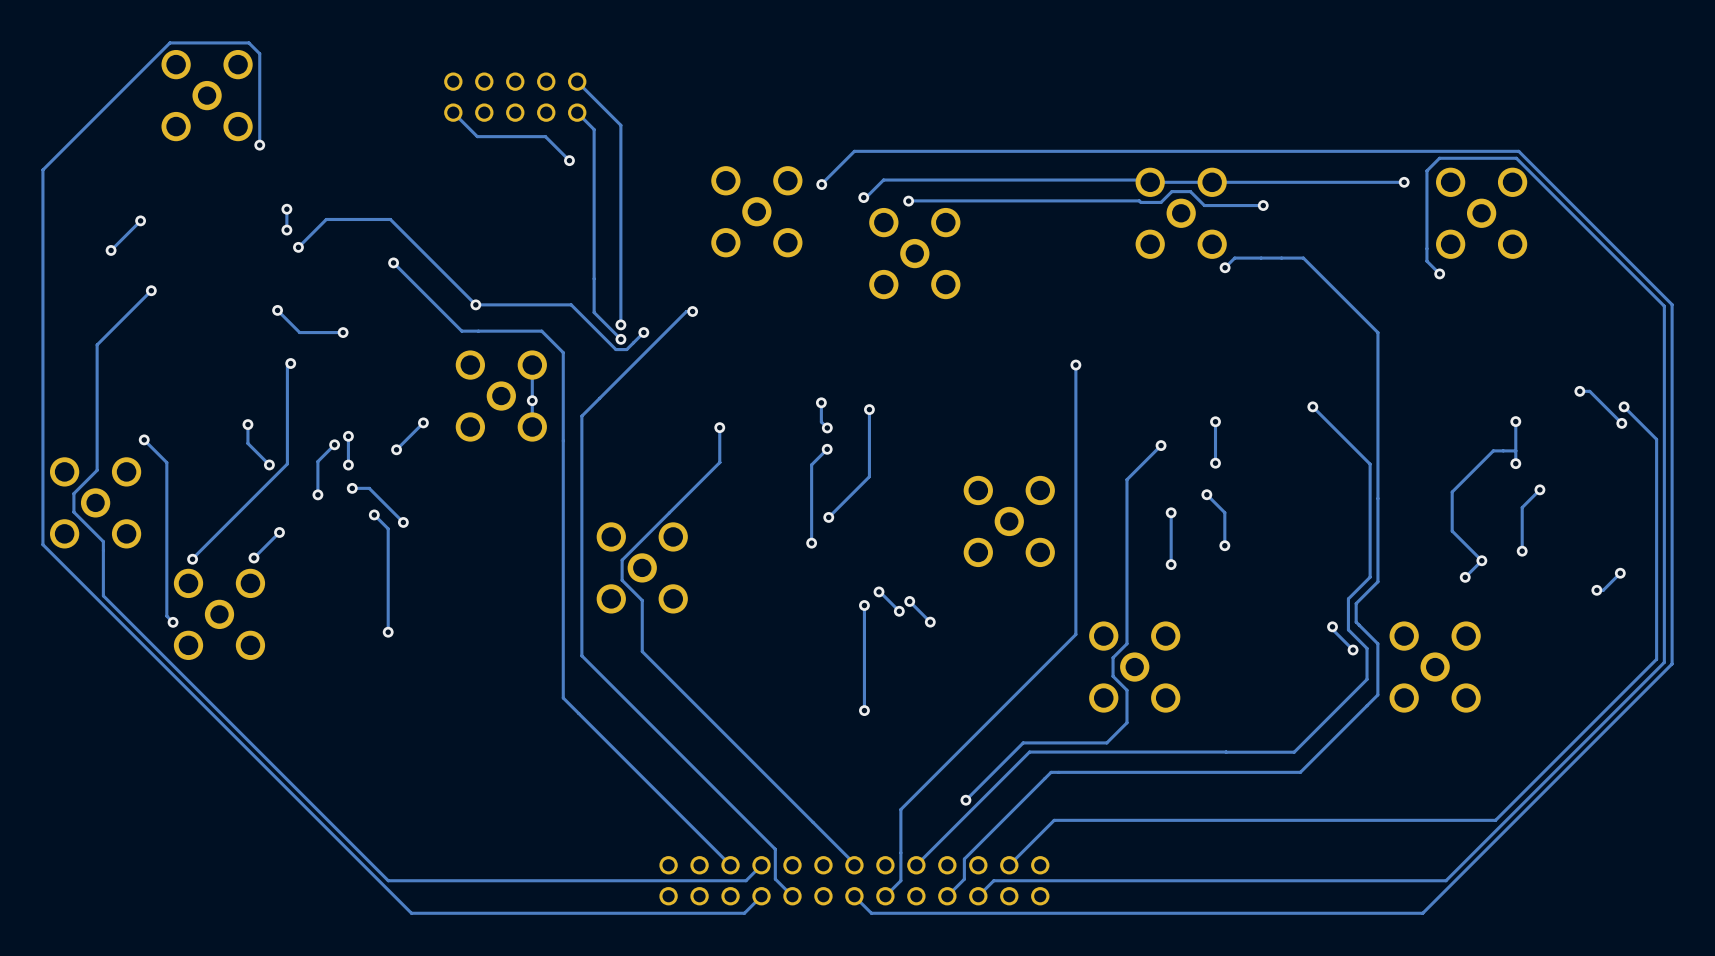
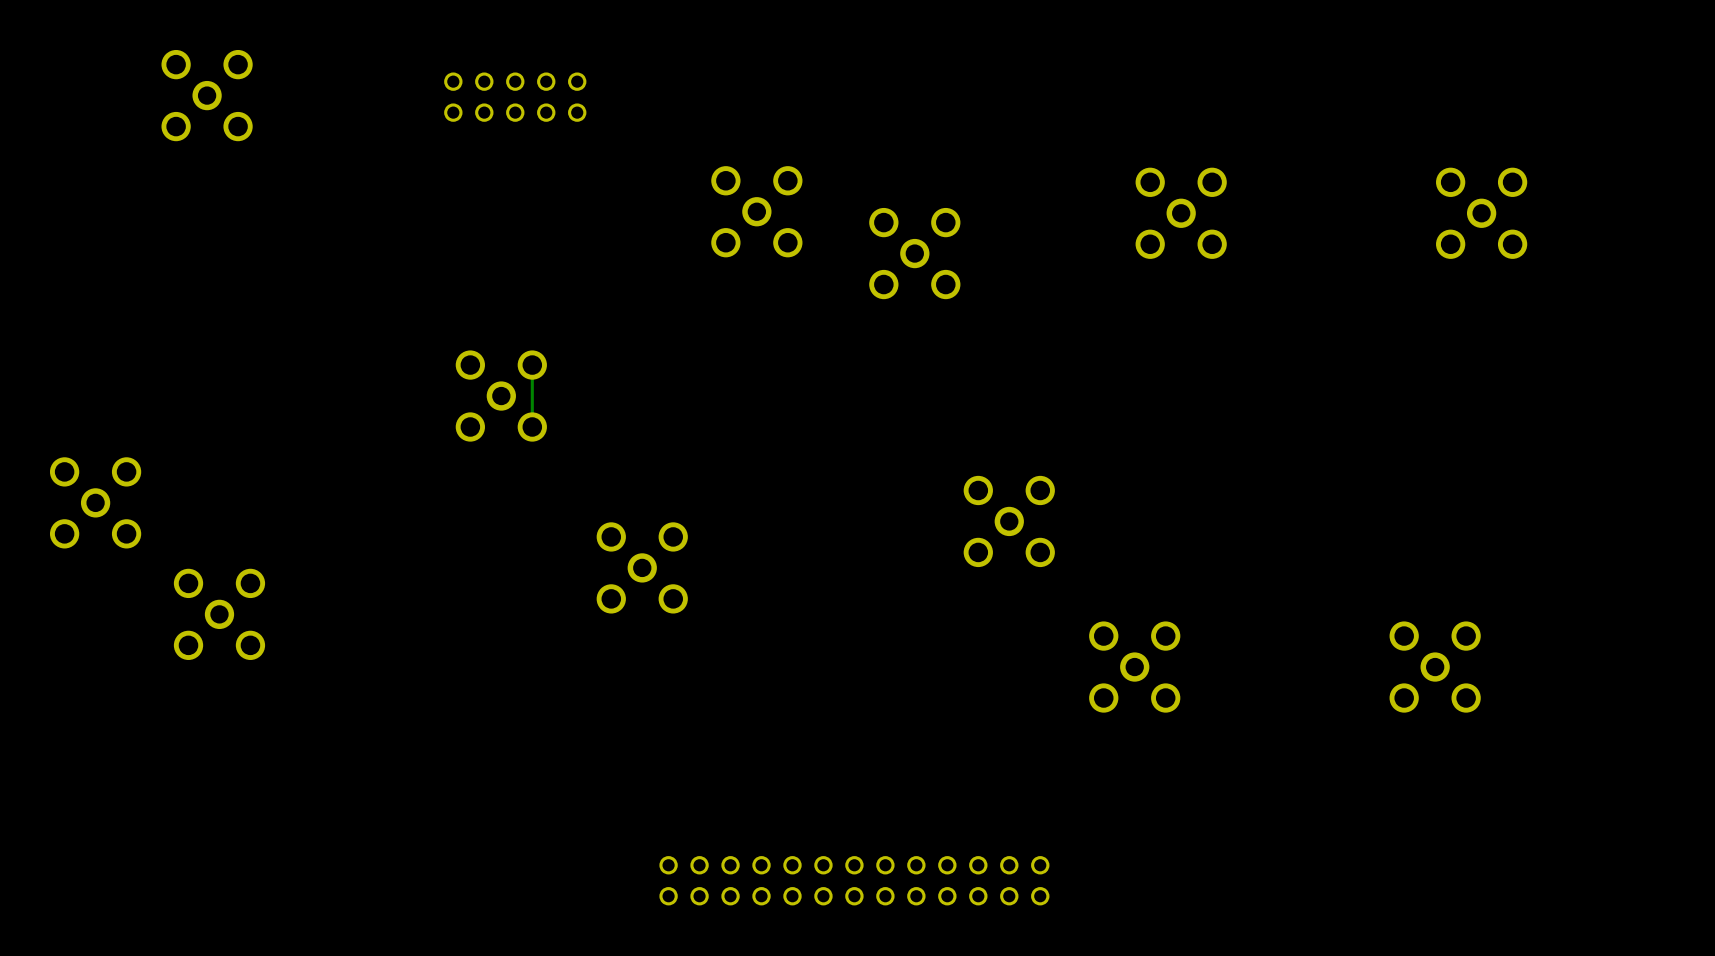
track: (577, 81) (620, 125) (620, 324) -> none
track: (453, 112) (477, 136) (545, 136) (569, 160) -> none
track: (577, 112) (594, 129) (594, 312) (620, 339) -> none
track: (259, 145) (259, 53) (248, 42) (169, 42) (42, 169) (42, 544) (411, 913) (744, 913) (761, 896) -> none
via: (259, 145) -> none
via: (569, 160) -> none
track: (1404, 182) (883, 180) (866, 197) (863, 197) -> none
via: (1404, 182) -> none
track: (821, 184) (854, 151) (1518, 151) (1672, 304) (1672, 663) (1422, 913) (871, 913) (854, 896) -> none
via: (821, 184) -> none
via: (863, 197) -> none
track: (908, 201) (1161, 202) (1171, 191) (1190, 191) (1204, 205) (1263, 205) -> none
via: (908, 201) -> none
via: (1263, 205) -> none
track: (286, 209) (286, 230) -> none
via: (286, 209) -> none
track: (140, 220) (111, 250) -> none
via: (140, 220) -> none
via: (286, 230) -> none
track: (298, 247) (326, 219) (390, 219) (475, 304) (571, 304) (615, 349) (626, 349) (643, 332) -> none
via: (298, 247) -> none
via: (111, 250) -> none
track: (393, 262) (461, 331) (541, 331) (563, 352) (563, 698) (730, 865) -> none
via: (393, 262) -> none
track: (1225, 267) (1234, 258) (1303, 258) (1377, 332) (1377, 581) (1356, 603) (1356, 622) (1377, 643) (1377, 694) (1300, 772) (1051, 772) (964, 859) (964, 879) (947, 896) -> none
via: (1225, 267) -> none
track: (1439, 273) (1426, 261) (1426, 170) (1439, 158) (1516, 158) (1664, 306) (1664, 662) (1446, 880) (993, 880) (978, 896) -> none
via: (1439, 273) -> none
track: (151, 290) (97, 344) (97, 470) (73, 493) (73, 512) (103, 541) (103, 595) (388, 880) (746, 880) (761, 865) -> none
via: (151, 290) -> none
via: (475, 304) -> none
track: (277, 310) (299, 332) (343, 332) -> none
via: (277, 310) -> none
track: (692, 311) (686, 311) (581, 416) (581, 655) (775, 849) (775, 879) (792, 896) -> none
via: (692, 311) -> none
via: (620, 324) -> none
via: (343, 332) -> none
via: (643, 332) -> none
via: (620, 339) -> none
track: (290, 363) (287, 366) (287, 463) (192, 559) -> none
via: (290, 363) -> none
track: (1075, 365) (1075, 634) (900, 809) (900, 880) (885, 896) -> none
via: (1075, 365) -> none
track: (1579, 391) (1589, 391) (1621, 423) -> none
via: (1579, 391) -> none
via: (532, 400) -> none
track: (821, 402) (821, 421) (827, 427) -> none
via: (821, 402) -> none
track: (1312, 406) (1370, 464) (1370, 577) (1348, 598) (1348, 629) (1367, 648) (1367, 679) (1294, 752) (1226, 752) -> none
via: (1312, 406) -> none
track: (1624, 406) (1656, 439) (1656, 659) (1495, 820) (1054, 820) (1009, 865) -> none
via: (1624, 406) -> none
track: (869, 409) (869, 476) (828, 517) -> none
via: (869, 409) -> none
track: (1215, 421) (1215, 463) -> none
via: (1215, 421) -> none
track: (1515, 421) (1515, 463) -> none
via: (1515, 421) -> none
track: (423, 422) (396, 449) -> none
via: (423, 422) -> none
via: (1621, 423) -> none
track: (247, 424) (247, 443) (269, 464) -> none
via: (247, 424) -> none
track: (719, 427) (719, 462) -> none
via: (719, 427) -> none
via: (827, 427) -> none
track: (348, 436) (348, 465) -> none
via: (348, 436) -> none
via: (144, 439) -> none
track: (144, 440) (166, 462) (166, 616) (173, 622) -> none
track: (334, 444) (317, 461) (317, 494) -> none
via: (334, 444) -> none
track: (1161, 445) (1126, 479) (1126, 643) (1113, 657) (1113, 676) (1126, 690) (1126, 722) (1106, 742) (1023, 742) (965, 800) -> none
via: (1161, 445) -> none
via: (396, 449) -> none
track: (827, 449) (811, 464) (811, 543) -> none
via: (827, 449) -> none
track: (1515, 450) (1493, 450) (1452, 492) (1452, 531) (1481, 560) (1465, 577) -> none
track: (719, 462) (622, 560) (622, 580) (642, 600) (642, 651) (854, 865) -> none
via: (1215, 463) -> none
via: (1515, 463) -> none
via: (269, 464) -> none
via: (348, 465) -> none
track: (352, 488) (369, 488) (403, 522) -> none
via: (352, 488) -> none
track: (1539, 489) (1522, 507) (1522, 551) -> none
via: (1539, 489) -> none
via: (317, 494) -> none
track: (1206, 494) (1224, 512) (1224, 545) -> none
via: (1206, 494) -> none
track: (1171, 512) (1171, 564) -> none
via: (1171, 512) -> none
track: (374, 514) (388, 528) (388, 632) -> none
via: (374, 514) -> none
via: (828, 517) -> none
via: (403, 522) -> none
track: (279, 532) (253, 558) -> none
via: (279, 532) -> none
via: (811, 543) -> none
via: (1224, 545) -> none
via: (1522, 551) -> none
via: (253, 558) -> none
via: (192, 559) -> none
via: (1481, 560) -> none
via: (1171, 564) -> none
track: (1620, 573) (1603, 590) (1596, 590) -> none
via: (1620, 573) -> none
via: (1465, 577) -> none
via: (1596, 590) -> none
track: (879, 591) (899, 611) -> none
via: (879, 591) -> none
track: (909, 601) (930, 622) -> none
via: (909, 601) -> none
track: (864, 605) (864, 710) -> none
via: (864, 605) -> none
via: (899, 611) -> none
via: (173, 622) -> none
via: (930, 622) -> none
track: (1332, 626) (1332, 629) (1353, 650) -> none
via: (1332, 626) -> none
via: (388, 632) -> none
via: (1353, 650) -> none
via: (864, 710) -> none
track: (1226, 752) (1029, 752) (916, 865) -> none
via: (965, 800) -> none

